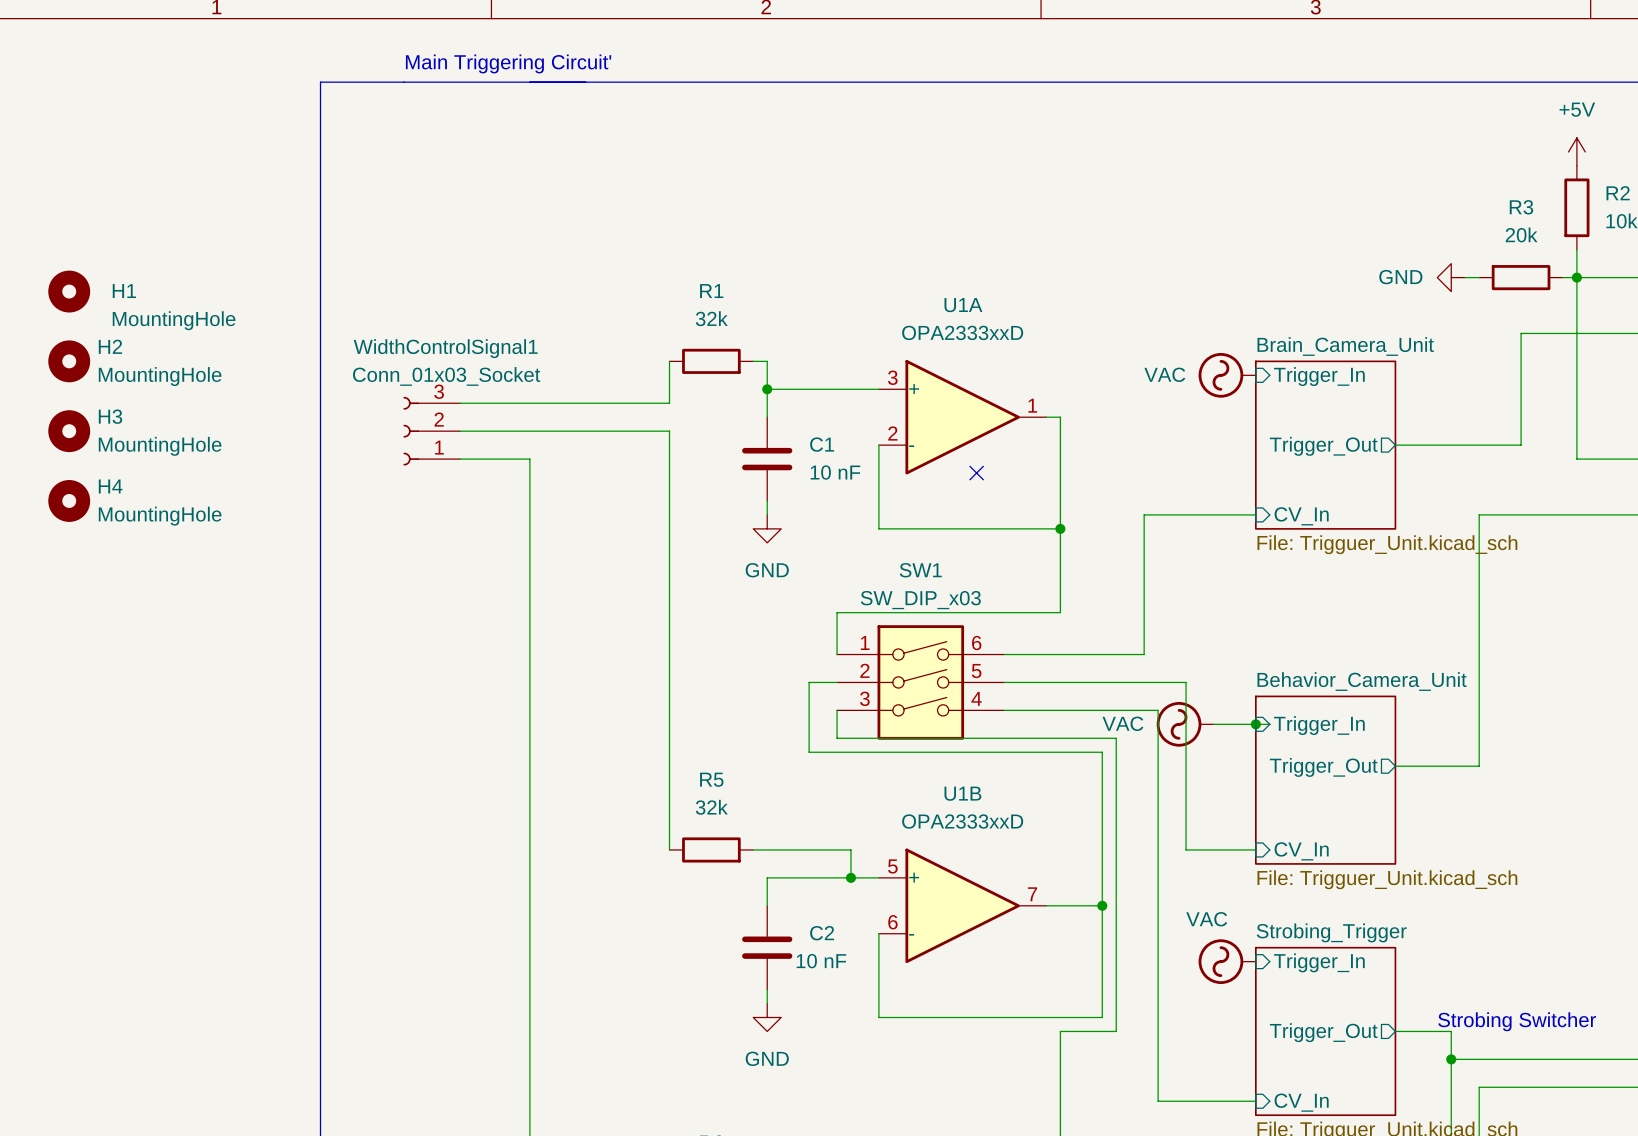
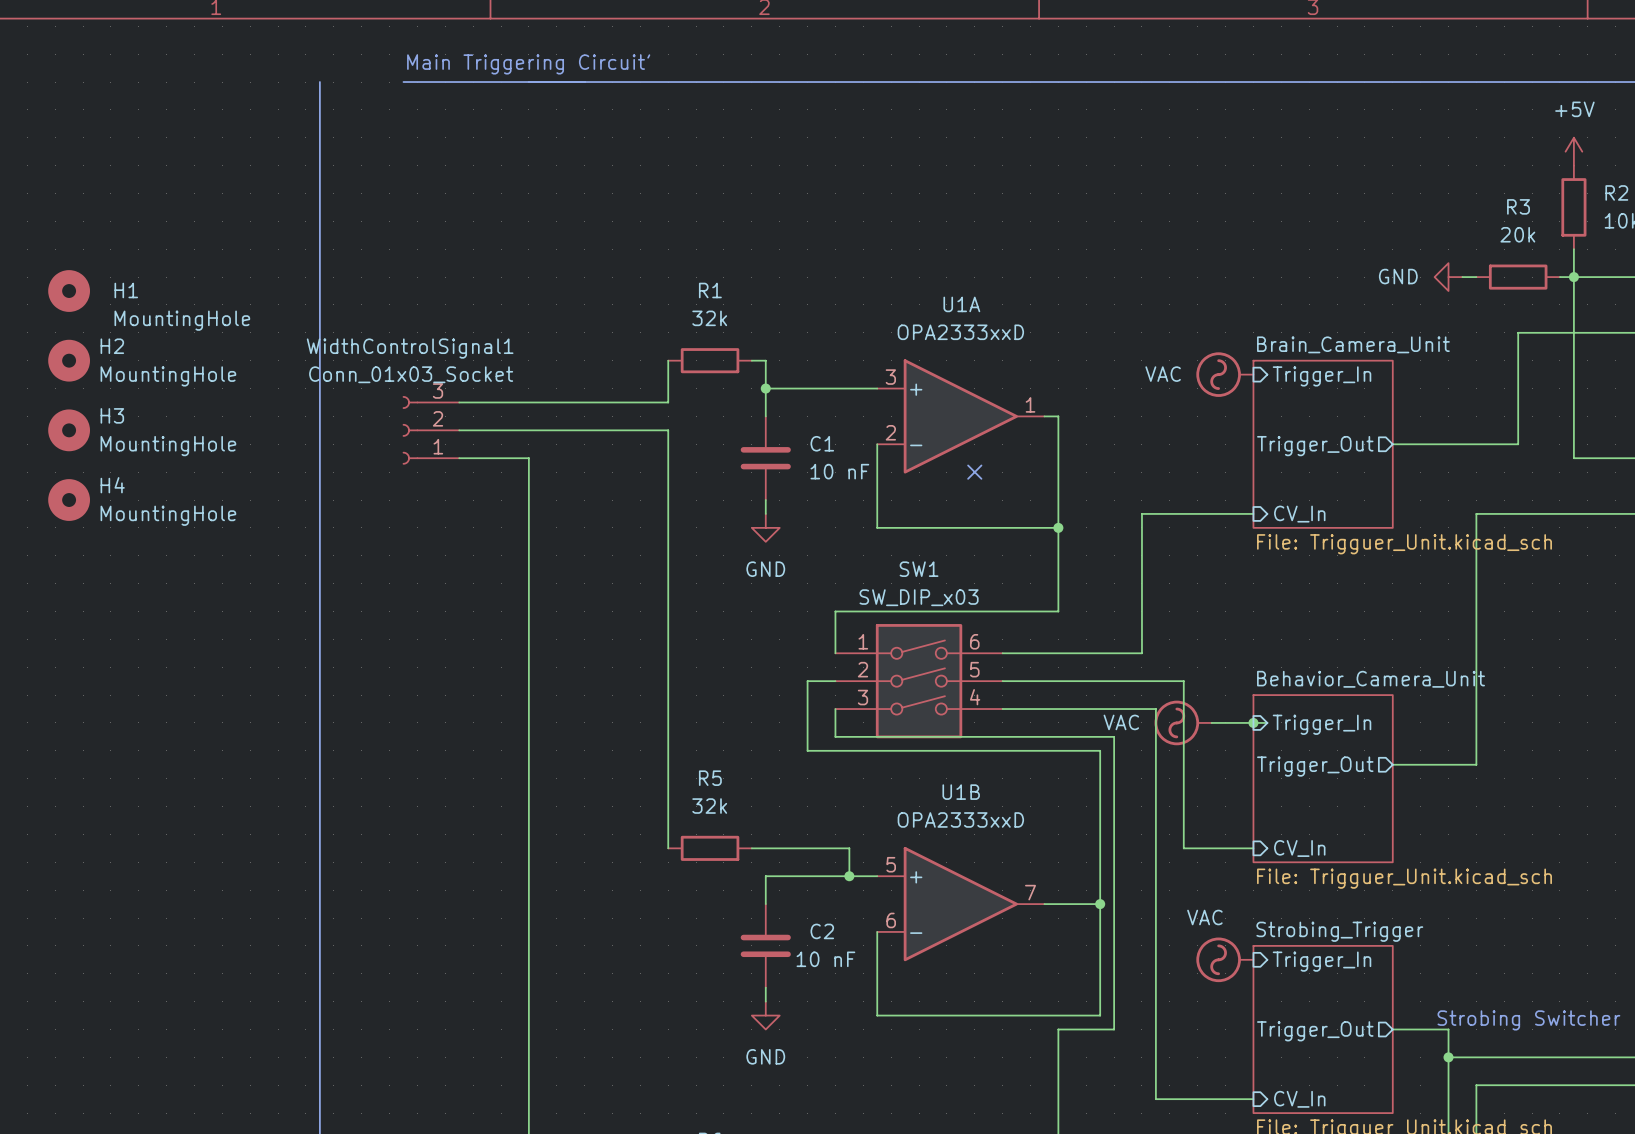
line: (320, 82) (404, 82) -> none
WidthControlSignal1 name position: WidthControlSignal1 (445, 348) -> WidthControlSignal1 (410, 348)
WidthControlSignal1 value position: Conn_01x03_Socket (446, 376) -> Conn_01x03_Socket (411, 374)

